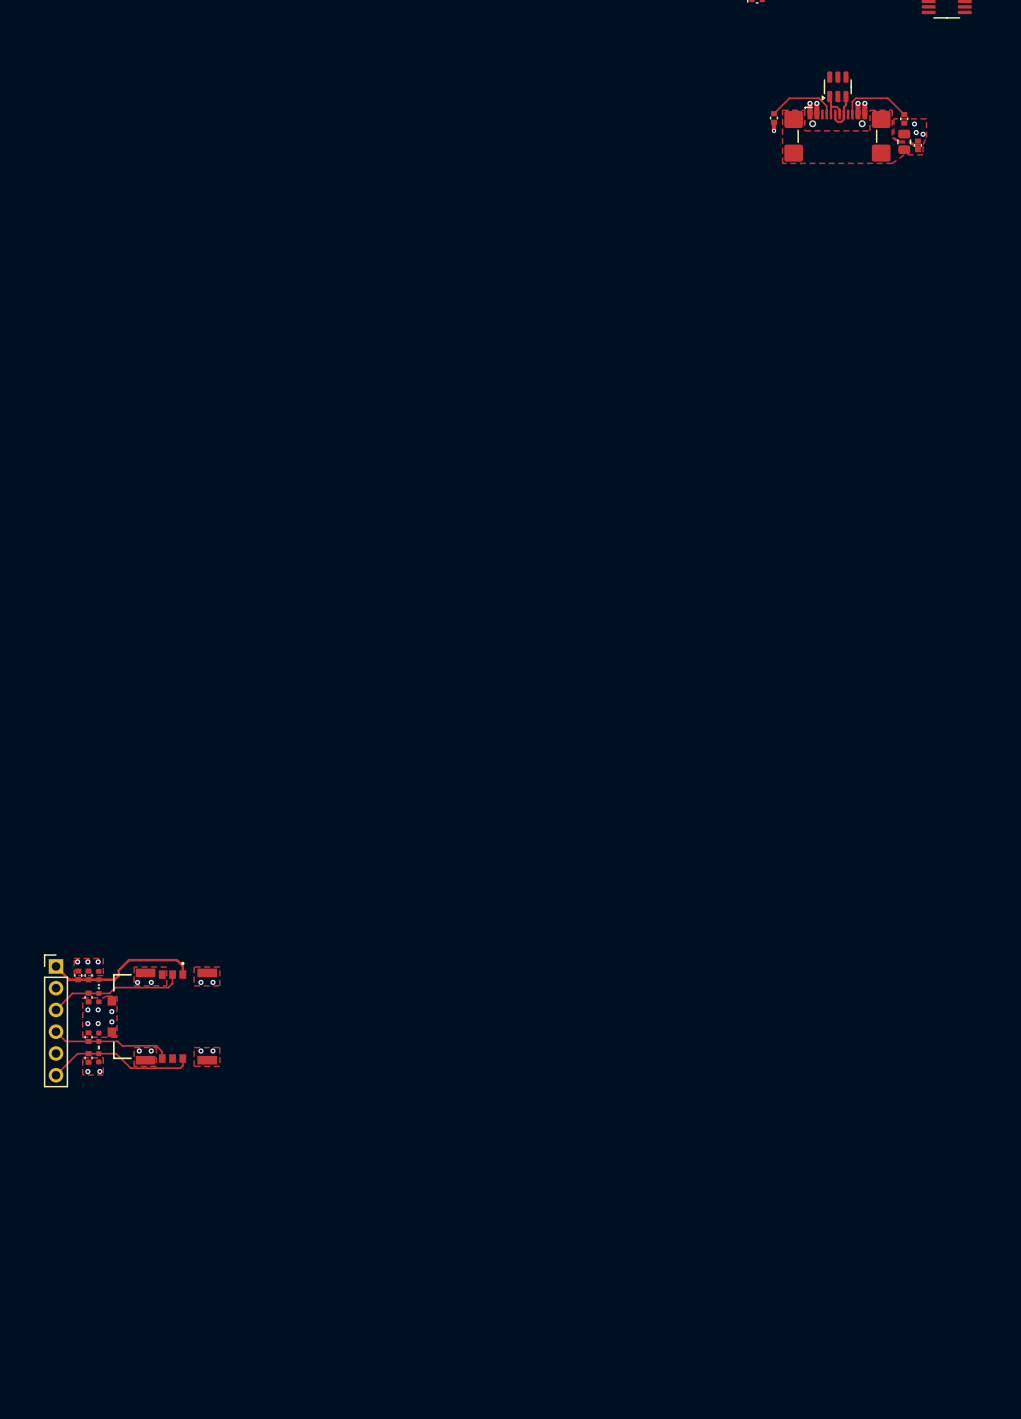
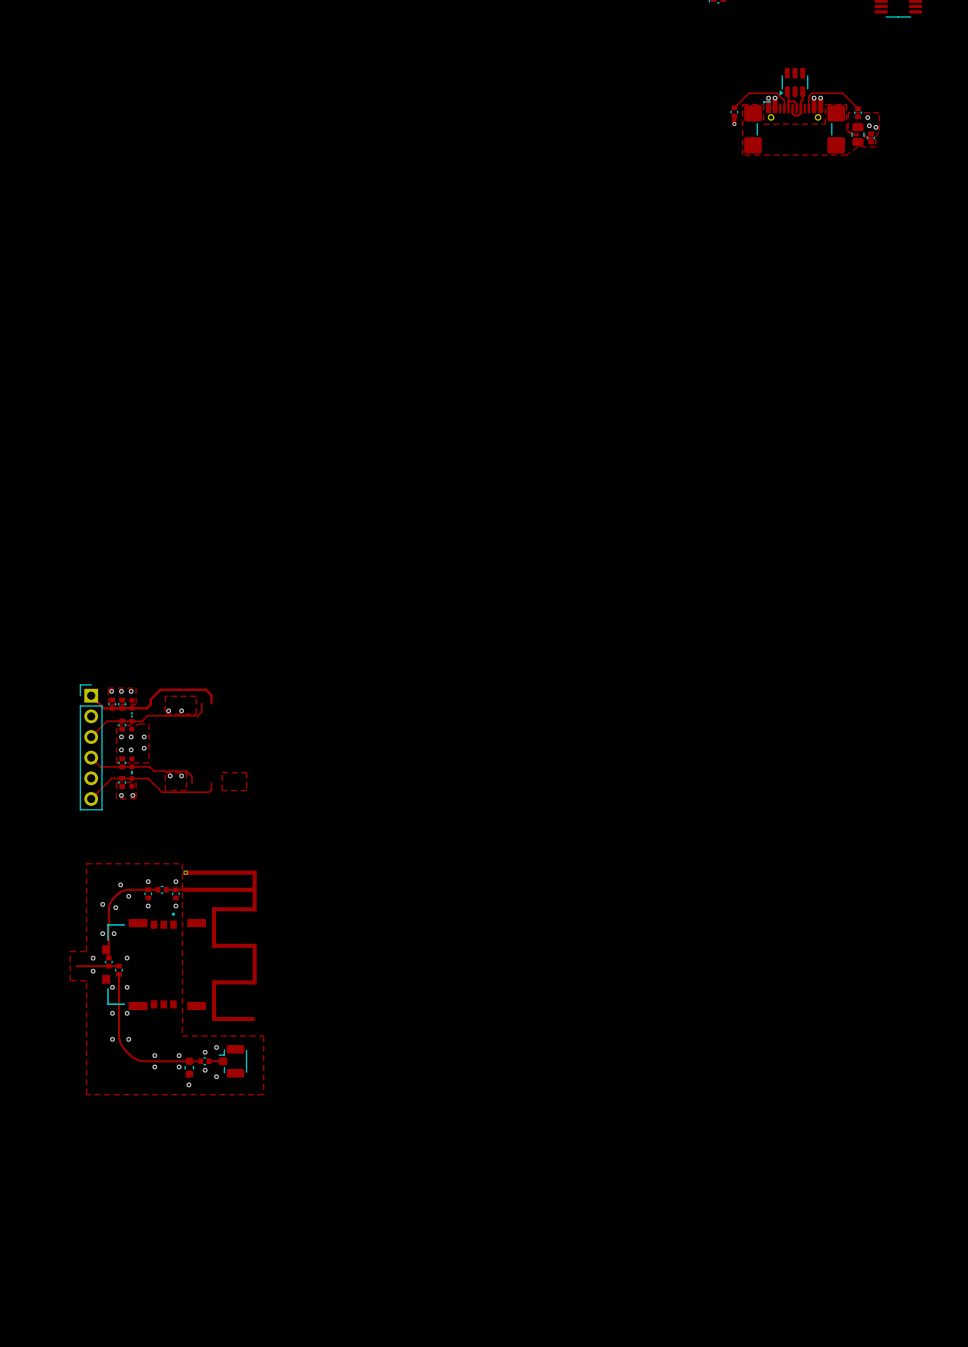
top zone outline: none -> (108, 688) (136, 688) (136, 704) (108, 704) (108, 688)
via: none -> (111, 691)
via: none -> (121, 691)
via: none -> (131, 691)
top track: none -> (91, 695) (103, 708) (146, 708) (150, 704) (150, 699) (160, 689) (205, 689) (211, 695) (211, 703)
top zone outline: none -> (165, 696) (165, 714) (196, 714) (196, 696) (165, 696)
top track: none -> (201, 703) (201, 711) (197, 715) (147, 715) (141, 721) (106, 721) (91, 737)
part: none -> (112, 704)
part: none -> (122, 704)
part: none -> (131, 706)
via: none -> (168, 710)
via: none -> (181, 710)
part: none -> (131, 723)
top zone outline: none -> (139, 723) (116, 725) (116, 762) (149, 762) (149, 723) (139, 723)
part: none -> (122, 725)
via: none -> (121, 736)
via: none -> (131, 736)
via: none -> (144, 736)
part: none -> (91, 747)
via: none -> (144, 748)
via: none -> (121, 749)
via: none -> (131, 749)
top track: none -> (91, 757) (100, 766) (149, 766) (153, 771) (186, 771) (192, 776) (192, 783)
part: none -> (122, 762)
part: none -> (131, 764)
top zone outline: none -> (165, 772) (186, 772) (186, 790) (165, 790) (165, 772)
via: none -> (170, 775)
via: none -> (181, 775)
part: none -> (131, 780)
top zone outline: none -> (116, 782) (116, 798) (136, 798) (136, 782) (116, 782)
part: none -> (122, 782)
top track: none -> (211, 783) (211, 789) (209, 792) (162, 792) (148, 778) (111, 778) (91, 798)
via: none -> (121, 795)
via: none -> (132, 795)
top zone outline: none -> (86, 863) (86, 951) (70, 951) (70, 980) (86, 980) (86, 1094) (263, 1094) (263, 1036) (182, 1036) (182, 863) (86, 863)
via: none -> (148, 881)
via: none -> (175, 881)
via: none -> (120, 884)
top track: none -> (158, 889) (124, 890) (111, 900) (108, 909) (108, 958)
part: none -> (162, 889)
top track: none -> (166, 889) (185, 889)
part: none -> (148, 893)
part: none -> (175, 893)
via: none -> (128, 896)
via: none -> (102, 904)
via: none -> (148, 906)
via: none -> (175, 906)
via: none -> (115, 907)
top zone outline: (74, 958) (103, 958) (103, 975) (74, 975) (74, 958) -> none
via: (77, 961) -> none
via: (87, 961) -> none
via: (98, 961) -> none
top track: (56, 966) (69, 979) (114, 979) (118, 975) (118, 970) (129, 960) (176, 960) (182, 966) (182, 974) -> none
top zone outline: (134, 967) (166, 967) (166, 985) (134, 985) (134, 967) -> none
top zone outline: (194, 967) (194, 985) (219, 985) (219, 967) (194, 967) -> (222, 772) (222, 790) (246, 790) (246, 772) (222, 772)
top track: (172, 974) (172, 983) (168, 987) (115, 987) (109, 993) (72, 993) (56, 1009) -> none
part: (78, 975) -> none
part: (88, 975) -> none
part: (98, 977) -> none
via: (137, 982) -> none
via: (151, 982) -> none
via: (200, 982) -> none
via: (212, 982) -> none
via: none -> (102, 933)
via: none -> (114, 933)
part: (98, 995) -> none
top zone outline: (106, 996) (82, 997) (82, 1037) (117, 1037) (117, 996) (106, 996) -> none
part: none -> (220, 945)
part: (88, 997) -> none
via: (87, 1009) -> none
via: none -> (127, 958)
via: (111, 1011) -> none
part: none -> (108, 962)
top track: none -> (76, 966) (118, 966)
part: (56, 1020) -> none
via: (111, 1021) -> none
part: none -> (118, 970)
via: (87, 1023) -> none
top track: none -> (118, 974) (119, 1036) (126, 1051) (134, 1058) (143, 1061) (200, 1061)
top track: (56, 1031) (65, 1041) (117, 1041) (122, 1045) (156, 1045) (162, 1051) (162, 1058) -> none
part: (88, 1037) -> none
part: (98, 1038) -> none
via: none -> (112, 987)
via: none -> (127, 987)
top zone outline: (134, 1047) (156, 1047) (156, 1066) (134, 1066) (134, 1047) -> none
top zone outline: (194, 1047) (219, 1047) (219, 1066) (194, 1066) (194, 1047) -> none
via: (139, 1050) -> none
via: (151, 1050) -> none
via: (200, 1050) -> none
via: (212, 1050) -> none
part: (98, 1056) -> none
top zone outline: (82, 1057) (82, 1074) (103, 1074) (103, 1057) (82, 1057) -> none
part: (88, 1057) -> none
top track: (182, 1058) (182, 1065) (180, 1068) (130, 1068) (116, 1053) (77, 1053) (56, 1075) -> none
via: none -> (112, 1013)
via: none -> (127, 1013)
via: (87, 1071) -> none
via: (99, 1071) -> none
via: none -> (112, 1039)
via: none -> (128, 1039)
via: none -> (216, 1047)
via: none -> (205, 1052)
via: none -> (154, 1055)
via: none -> (179, 1055)
part: none -> (204, 1061)
top track: none -> (208, 1061) (223, 1061)
part: none -> (232, 1061)
via: none -> (154, 1066)
via: none -> (179, 1066)
part: none -> (189, 1067)
via: none -> (205, 1070)
via: none -> (216, 1076)
via: none -> (188, 1084)

